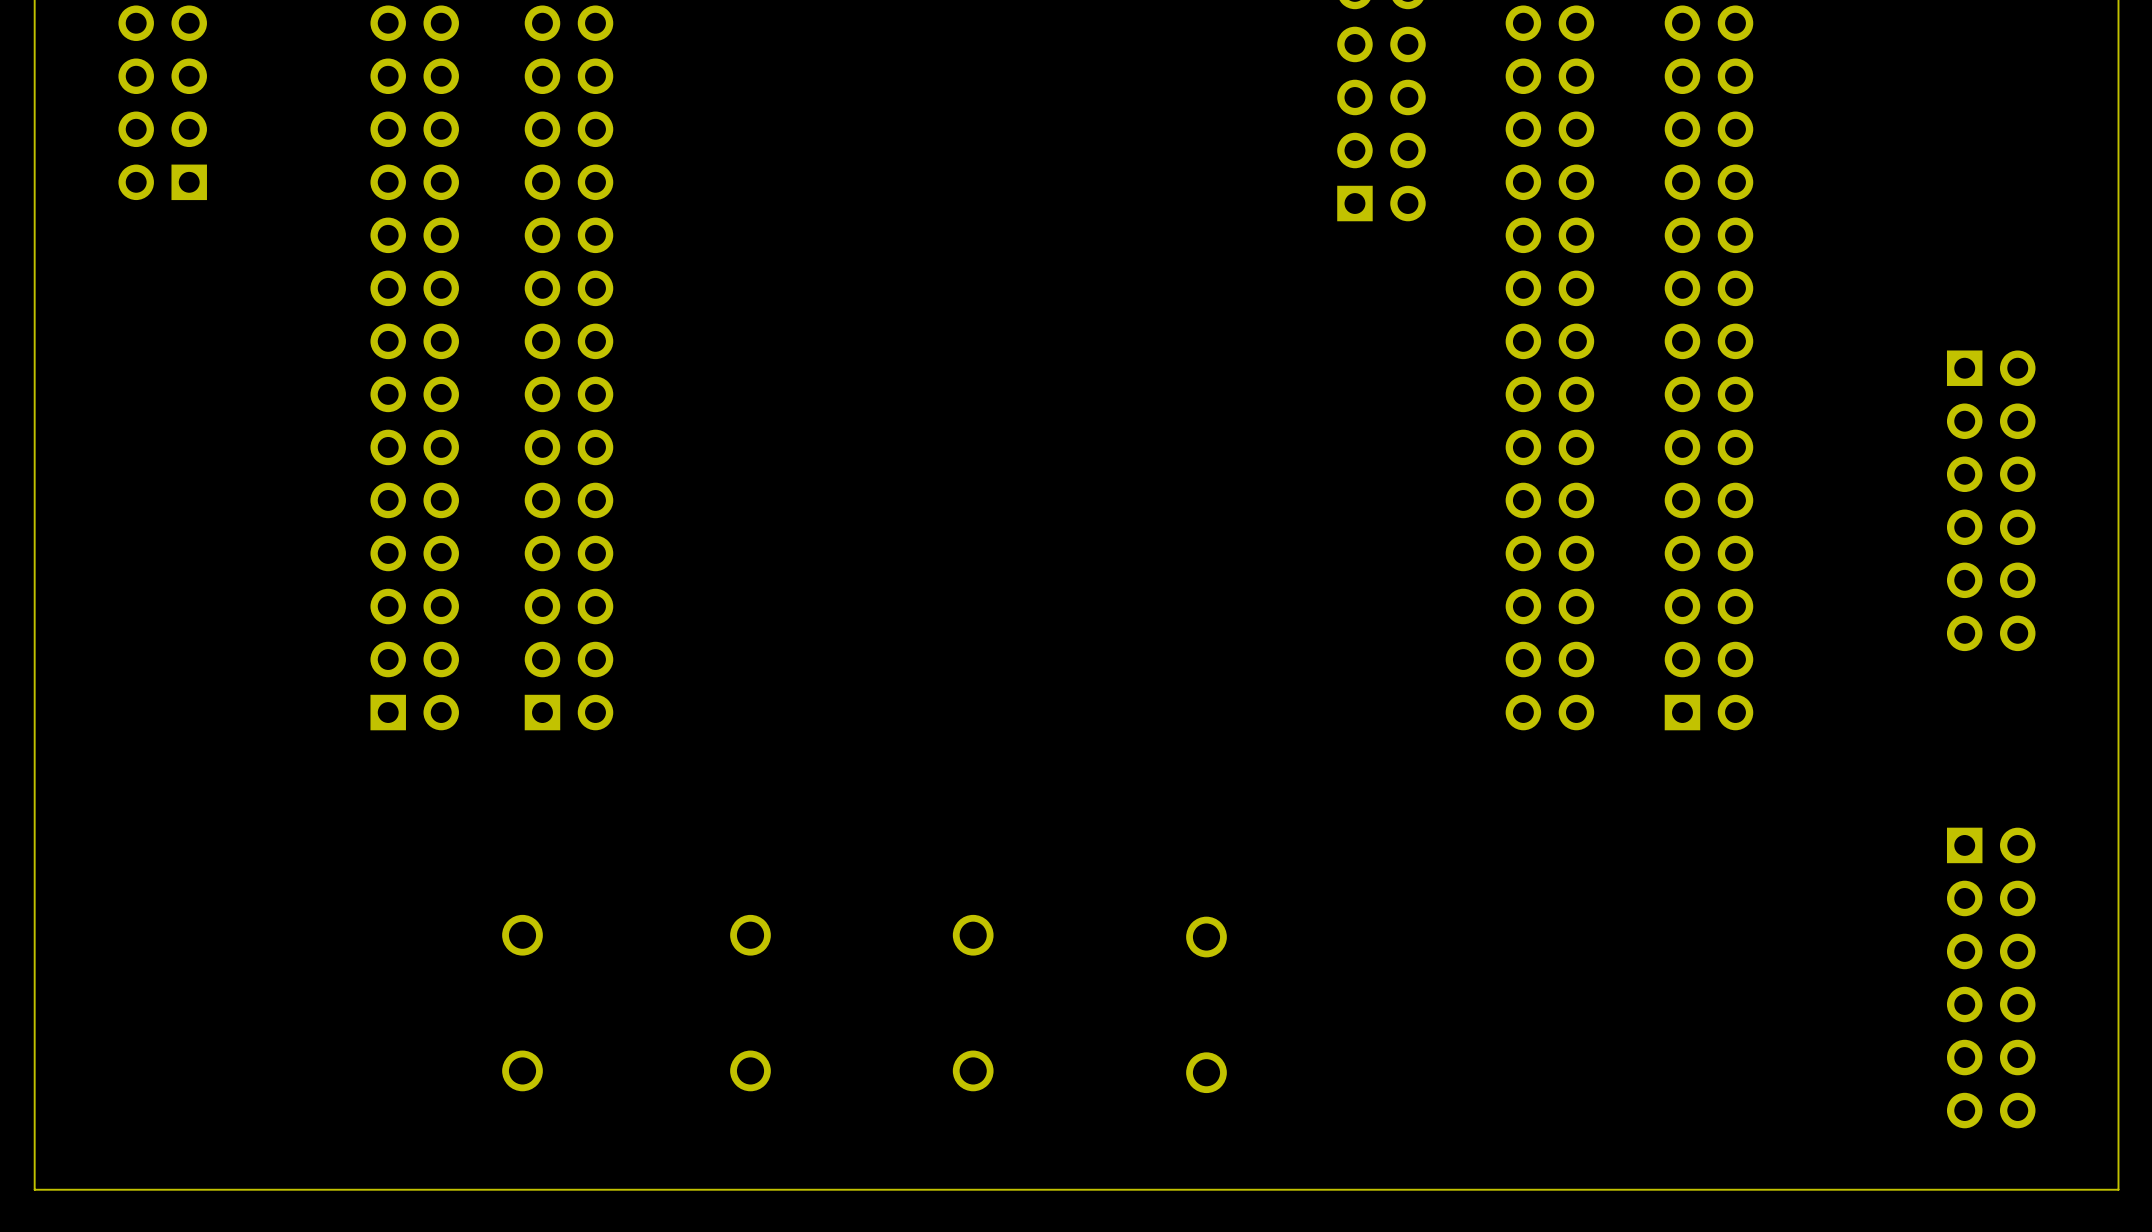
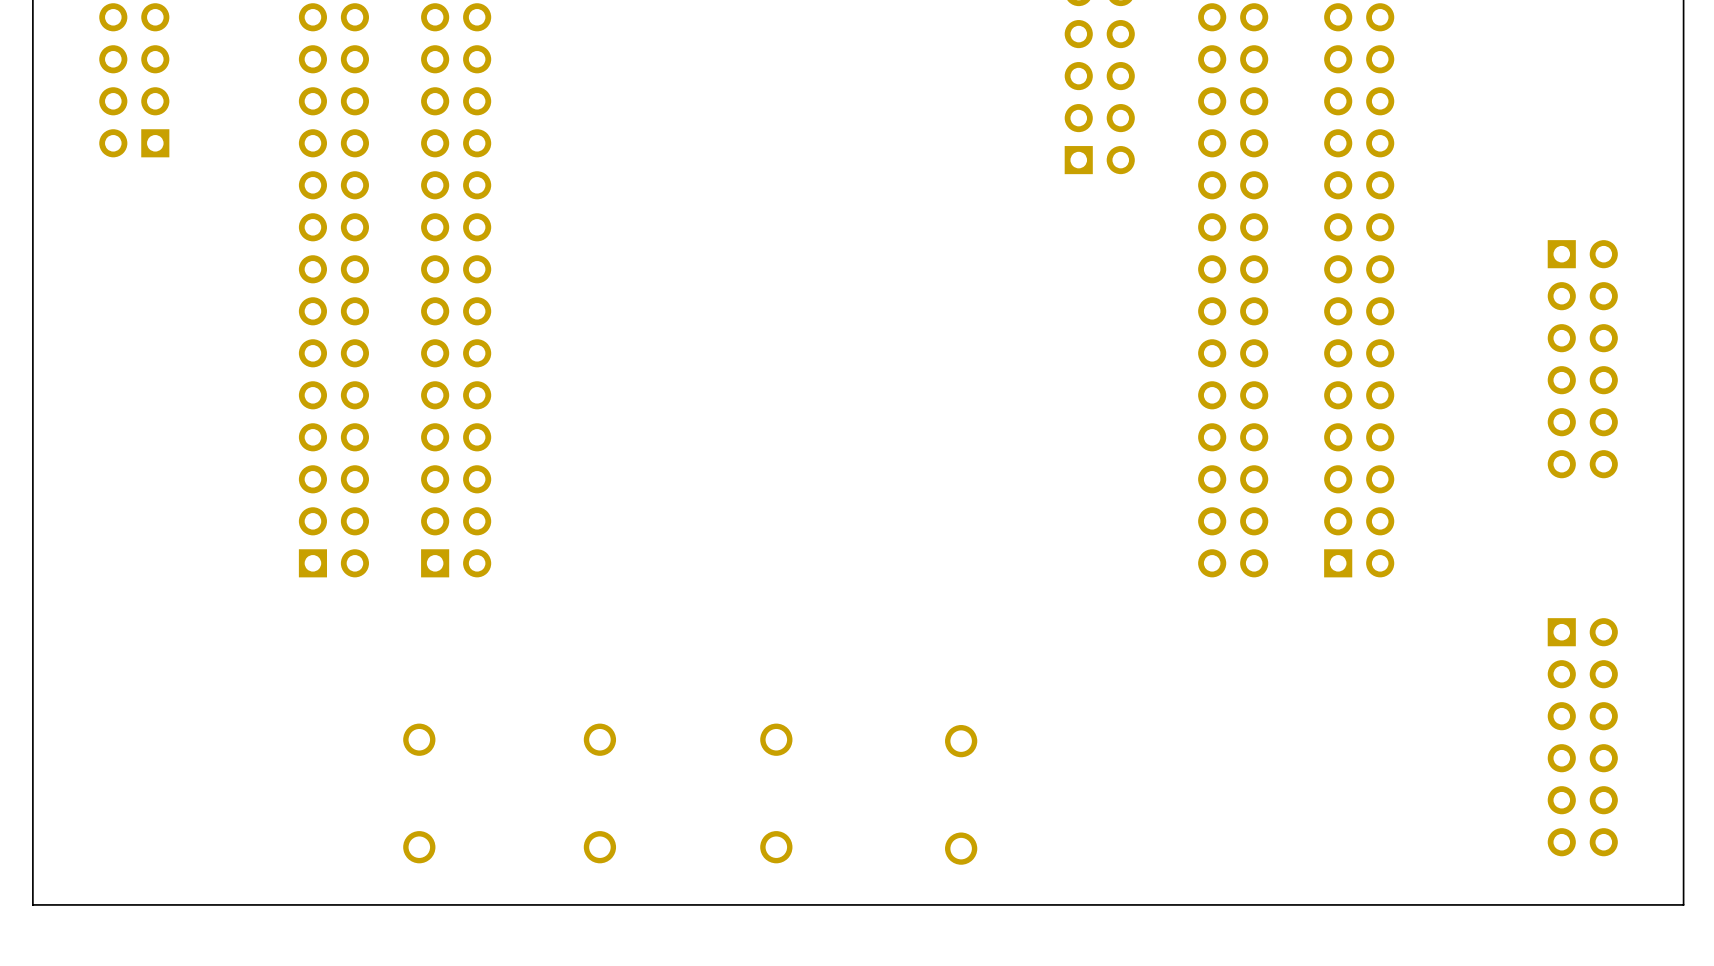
part position: (1991, 500) -> (1582, 359)
part position: (1991, 977) -> (1582, 737)
board edge: (2118, 1143) (2118, 1189) (34, 1189) (34, 1143) -> (1683, 904) (32, 904)

